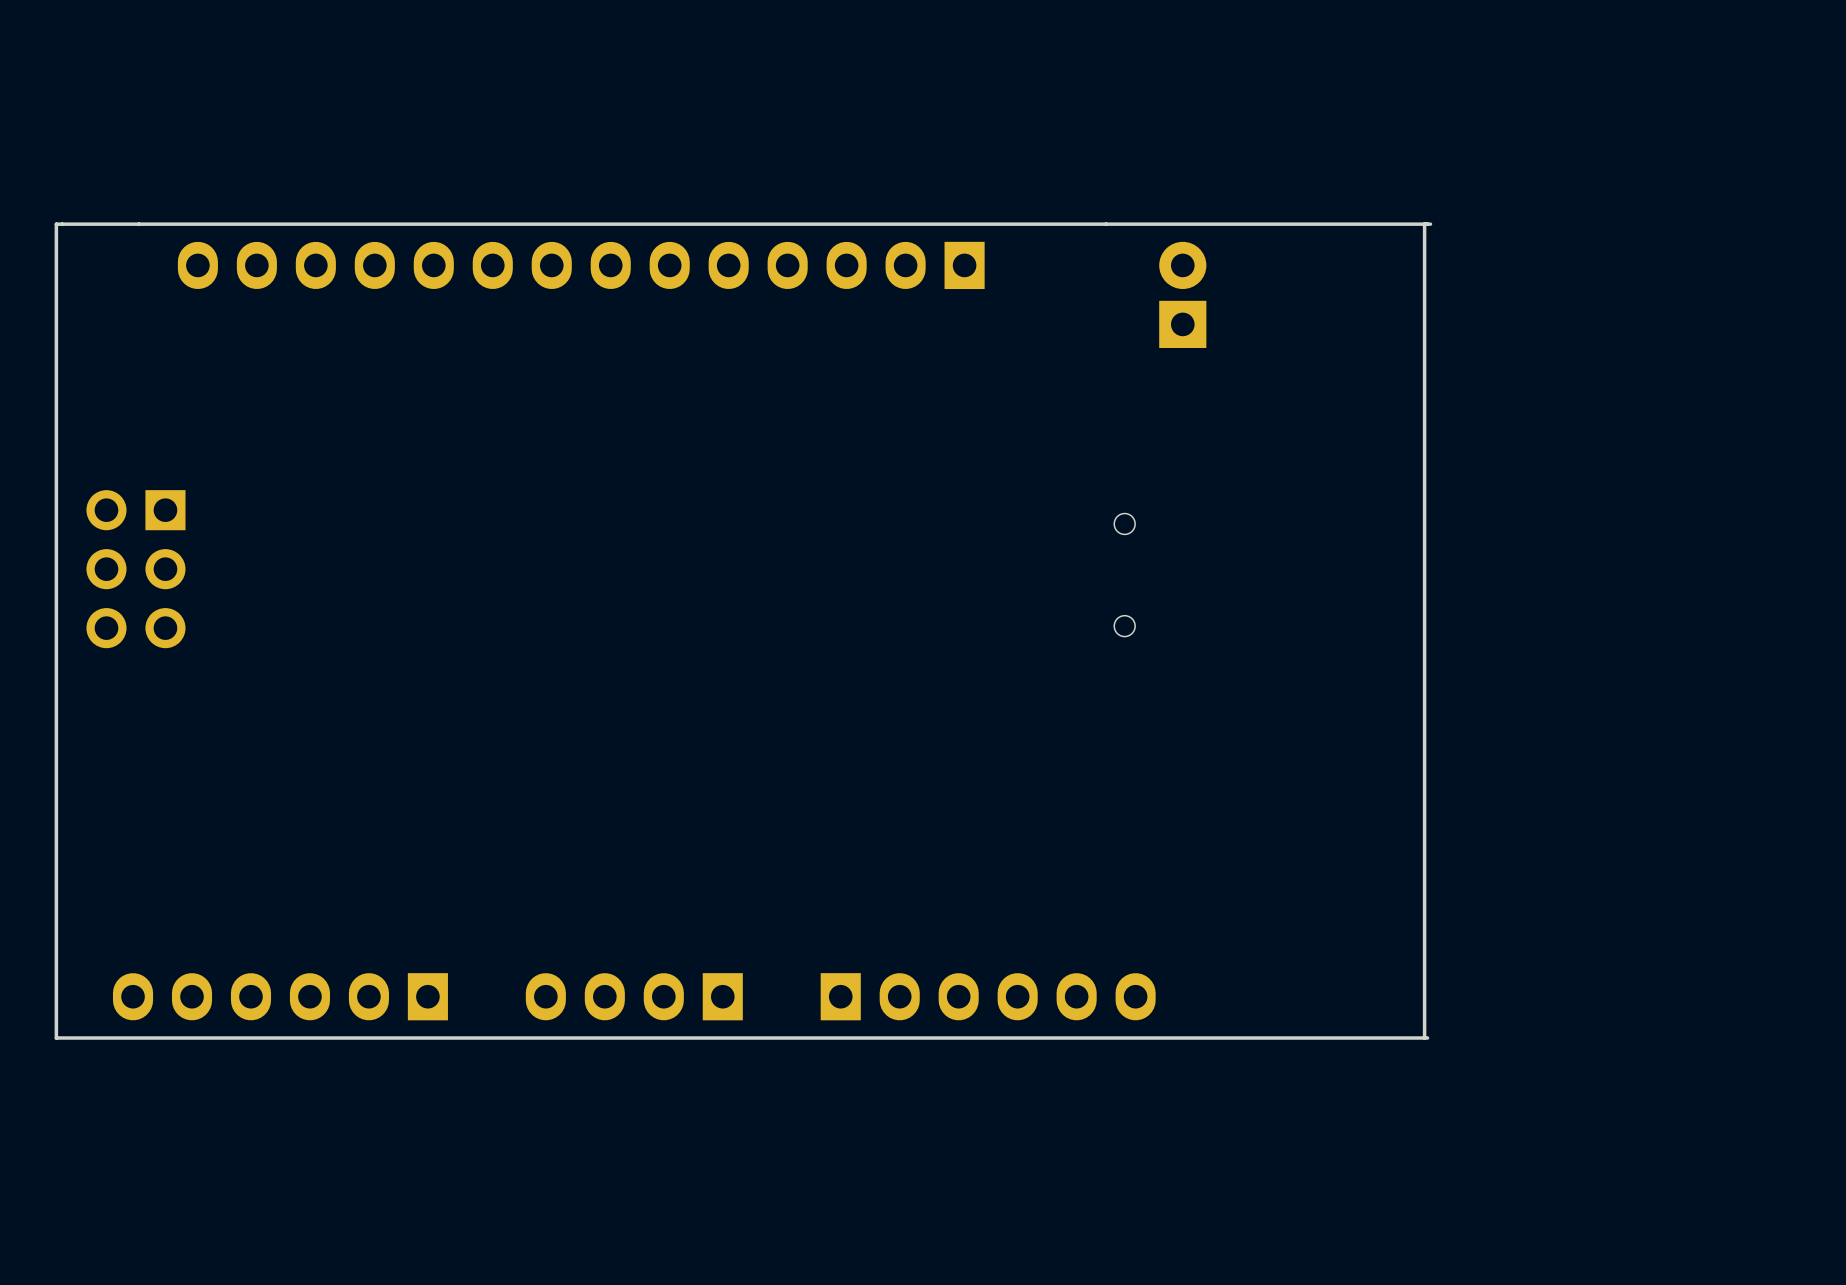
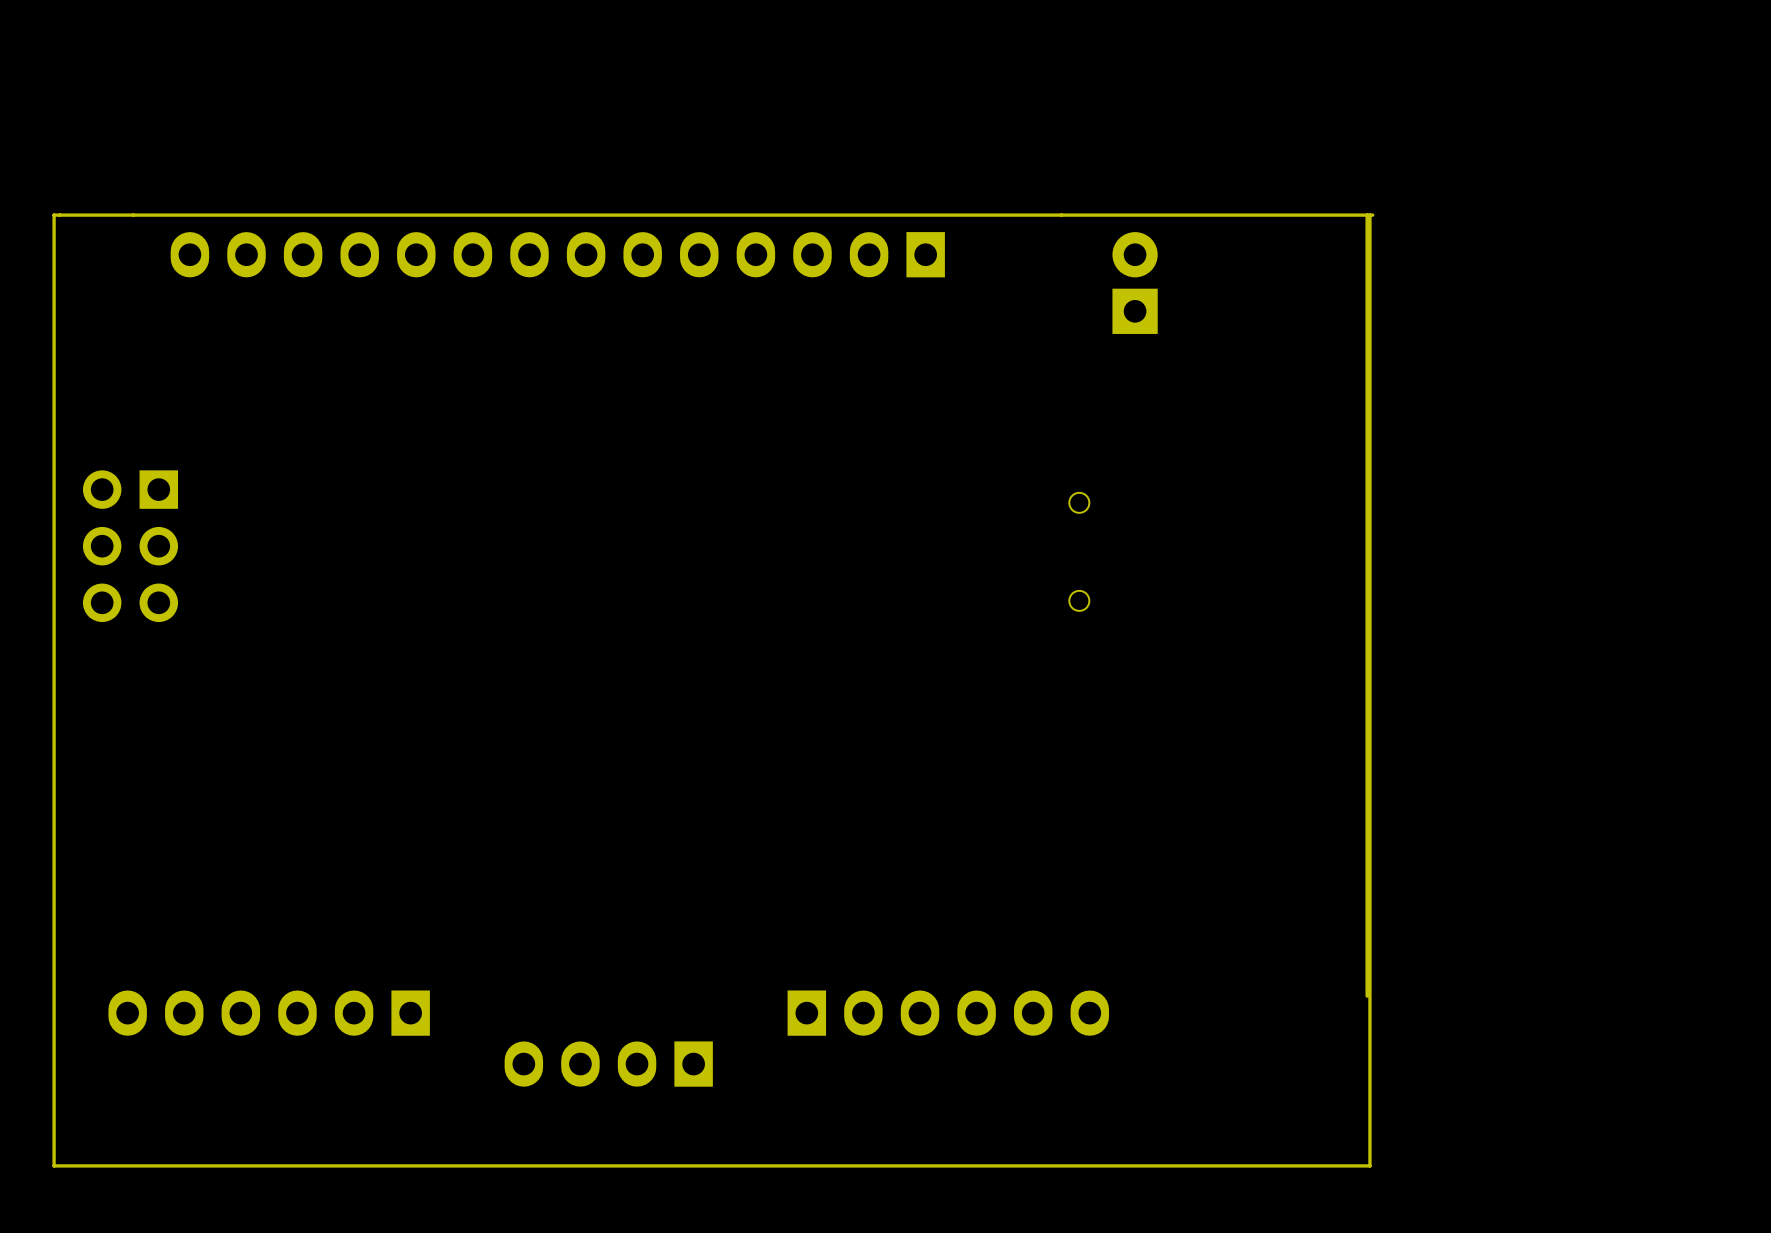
part position: (280, 996) -> (269, 1013)
part position: (634, 996) -> (608, 1064)
part position: (988, 996) -> (948, 1013)
board edge: (1427, 1038) (56, 1038) -> (1369, 215) (1369, 1165) (54, 1165) (54, 996)

